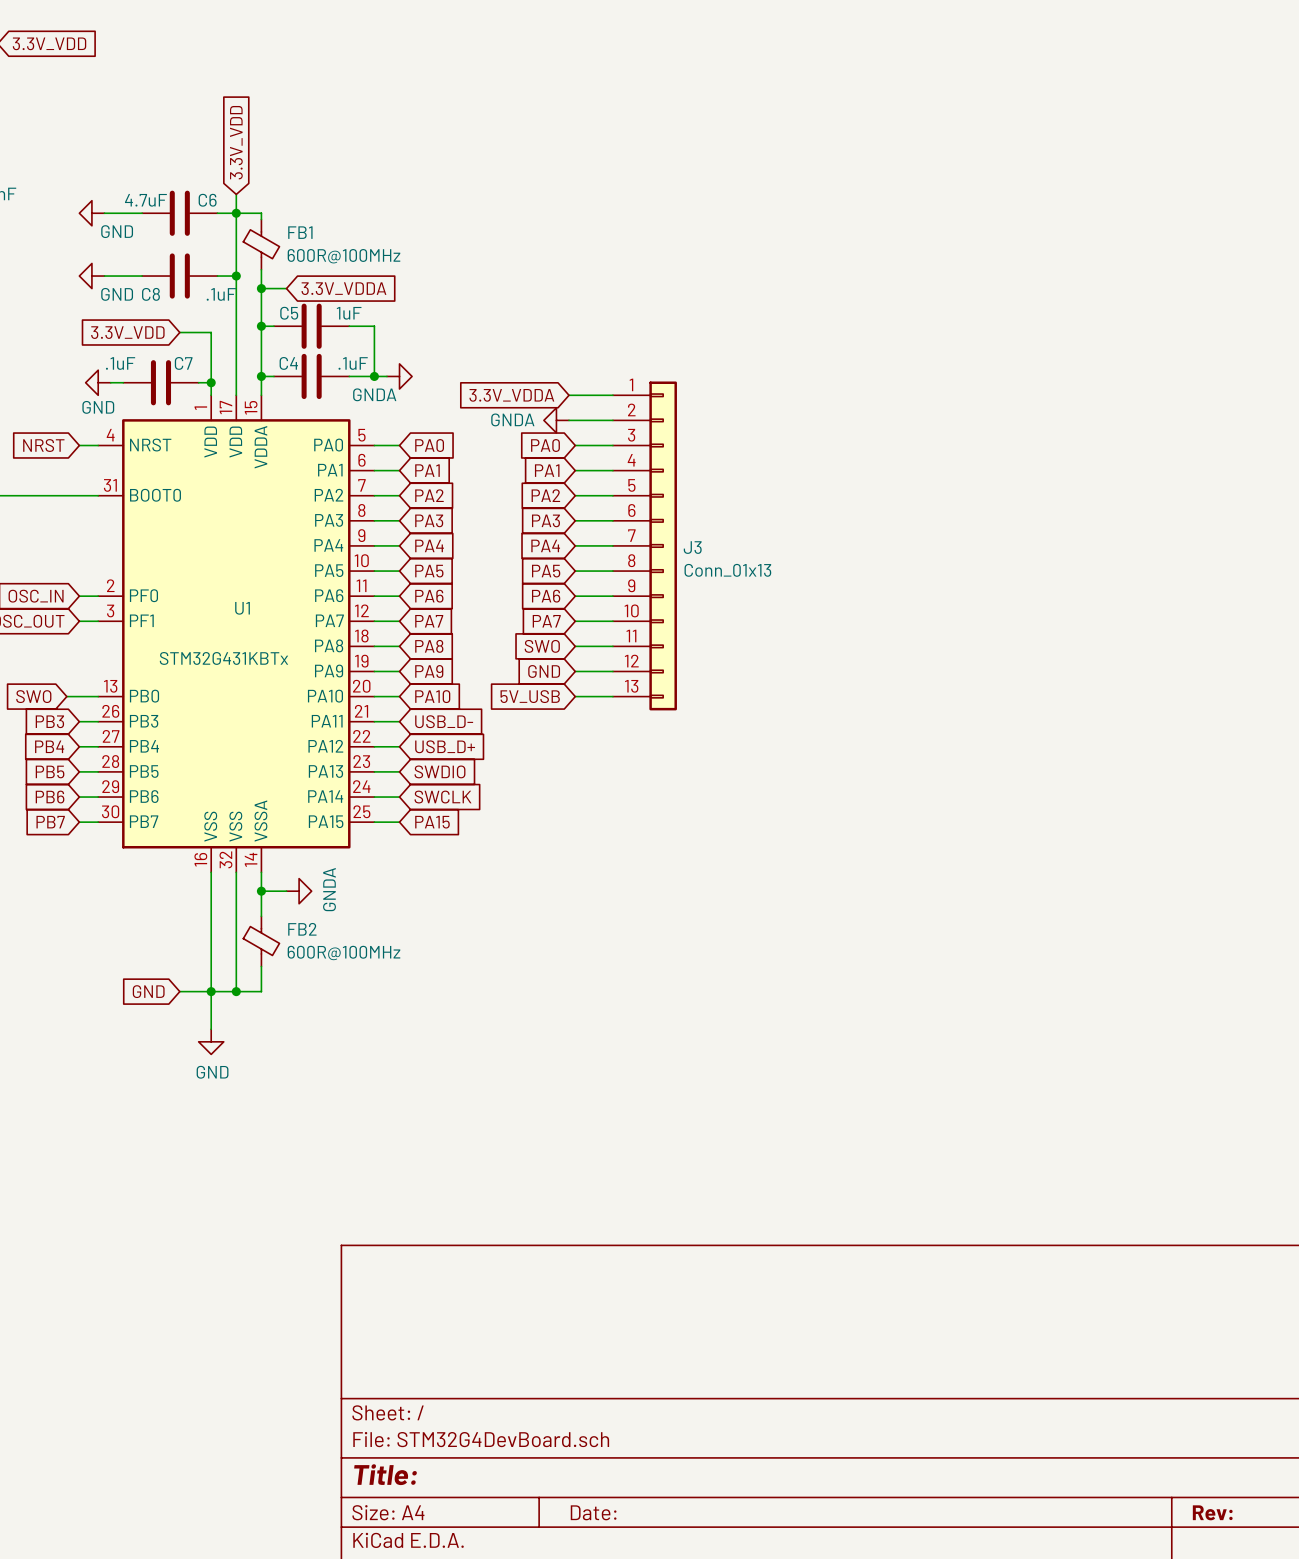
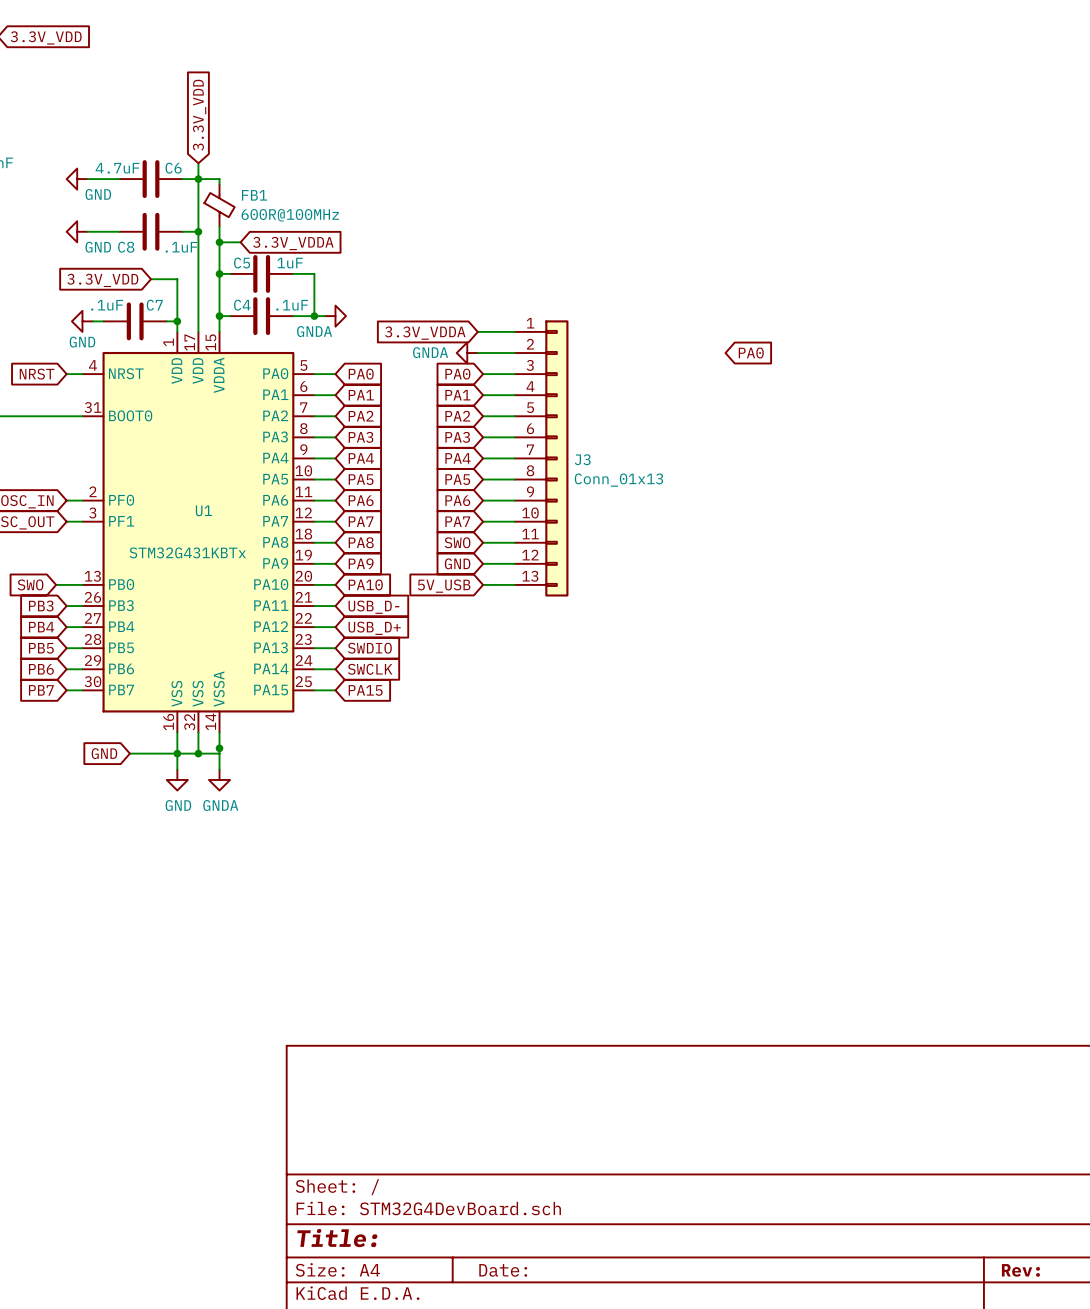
global label: none -> PA0 (751, 353)
wire: (261, 891) (286, 891) -> none
power symbol rotation: 0° (299, 891) -> 90° clockwise (219, 779)
power symbol position: GNDA (299, 891) -> GNDA (219, 779)
wire: none -> (129, 753) (219, 753)
junction: none -> (177, 753)
wire: (236, 897) (236, 991) -> none
junction: none -> (198, 753)
wire: (211, 916) (211, 1029) -> none
FB2: 600R@100MHz (261, 941) -> none
wire: (261, 966) (261, 991) (179, 991) -> none
global label position: GND (148, 991) -> GND (104, 753)
junction: (211, 991) -> none
junction: (236, 991) -> none
power symbol position: GND (211, 1041) -> GND (177, 779)

